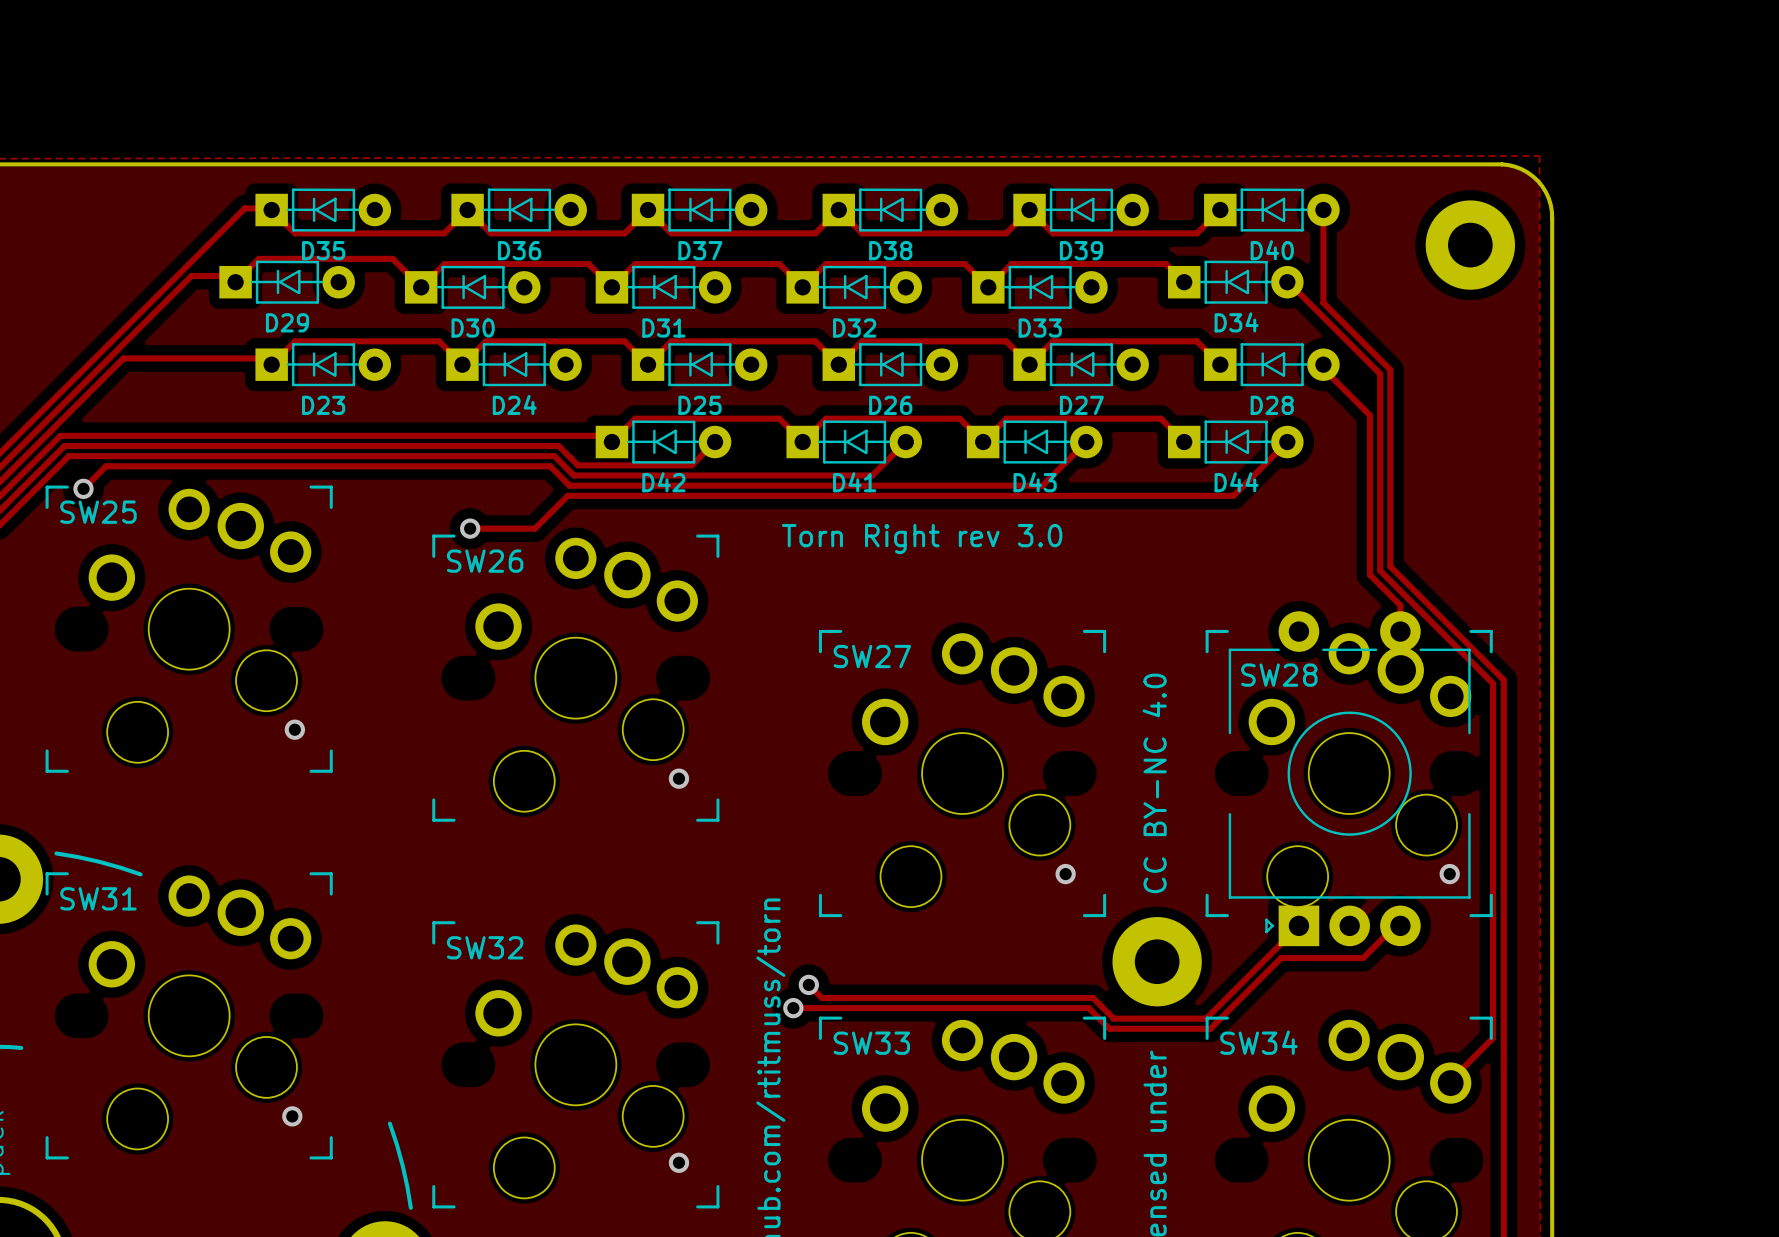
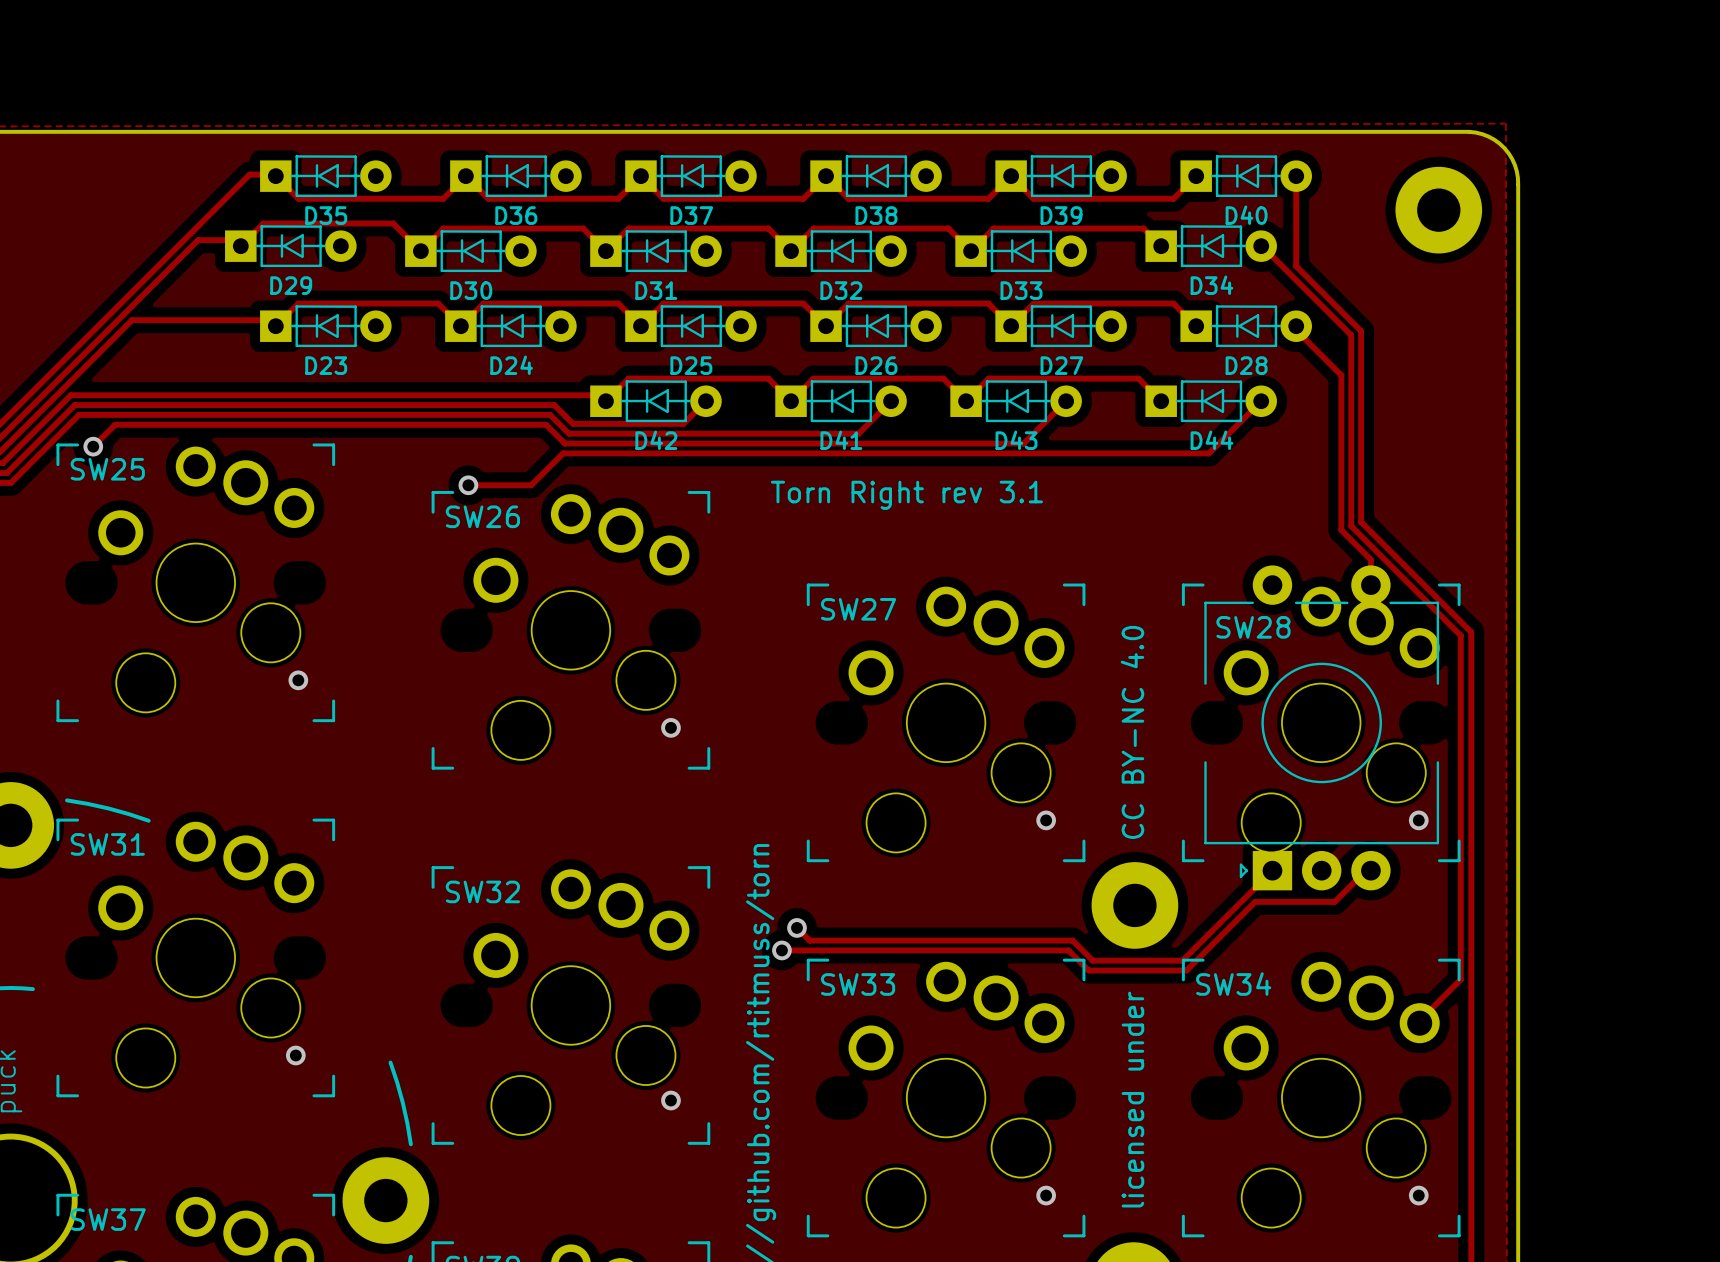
text: Torn Right rev 3.0 (922, 538) -> Torn Right rev 3.1 (906, 495)

